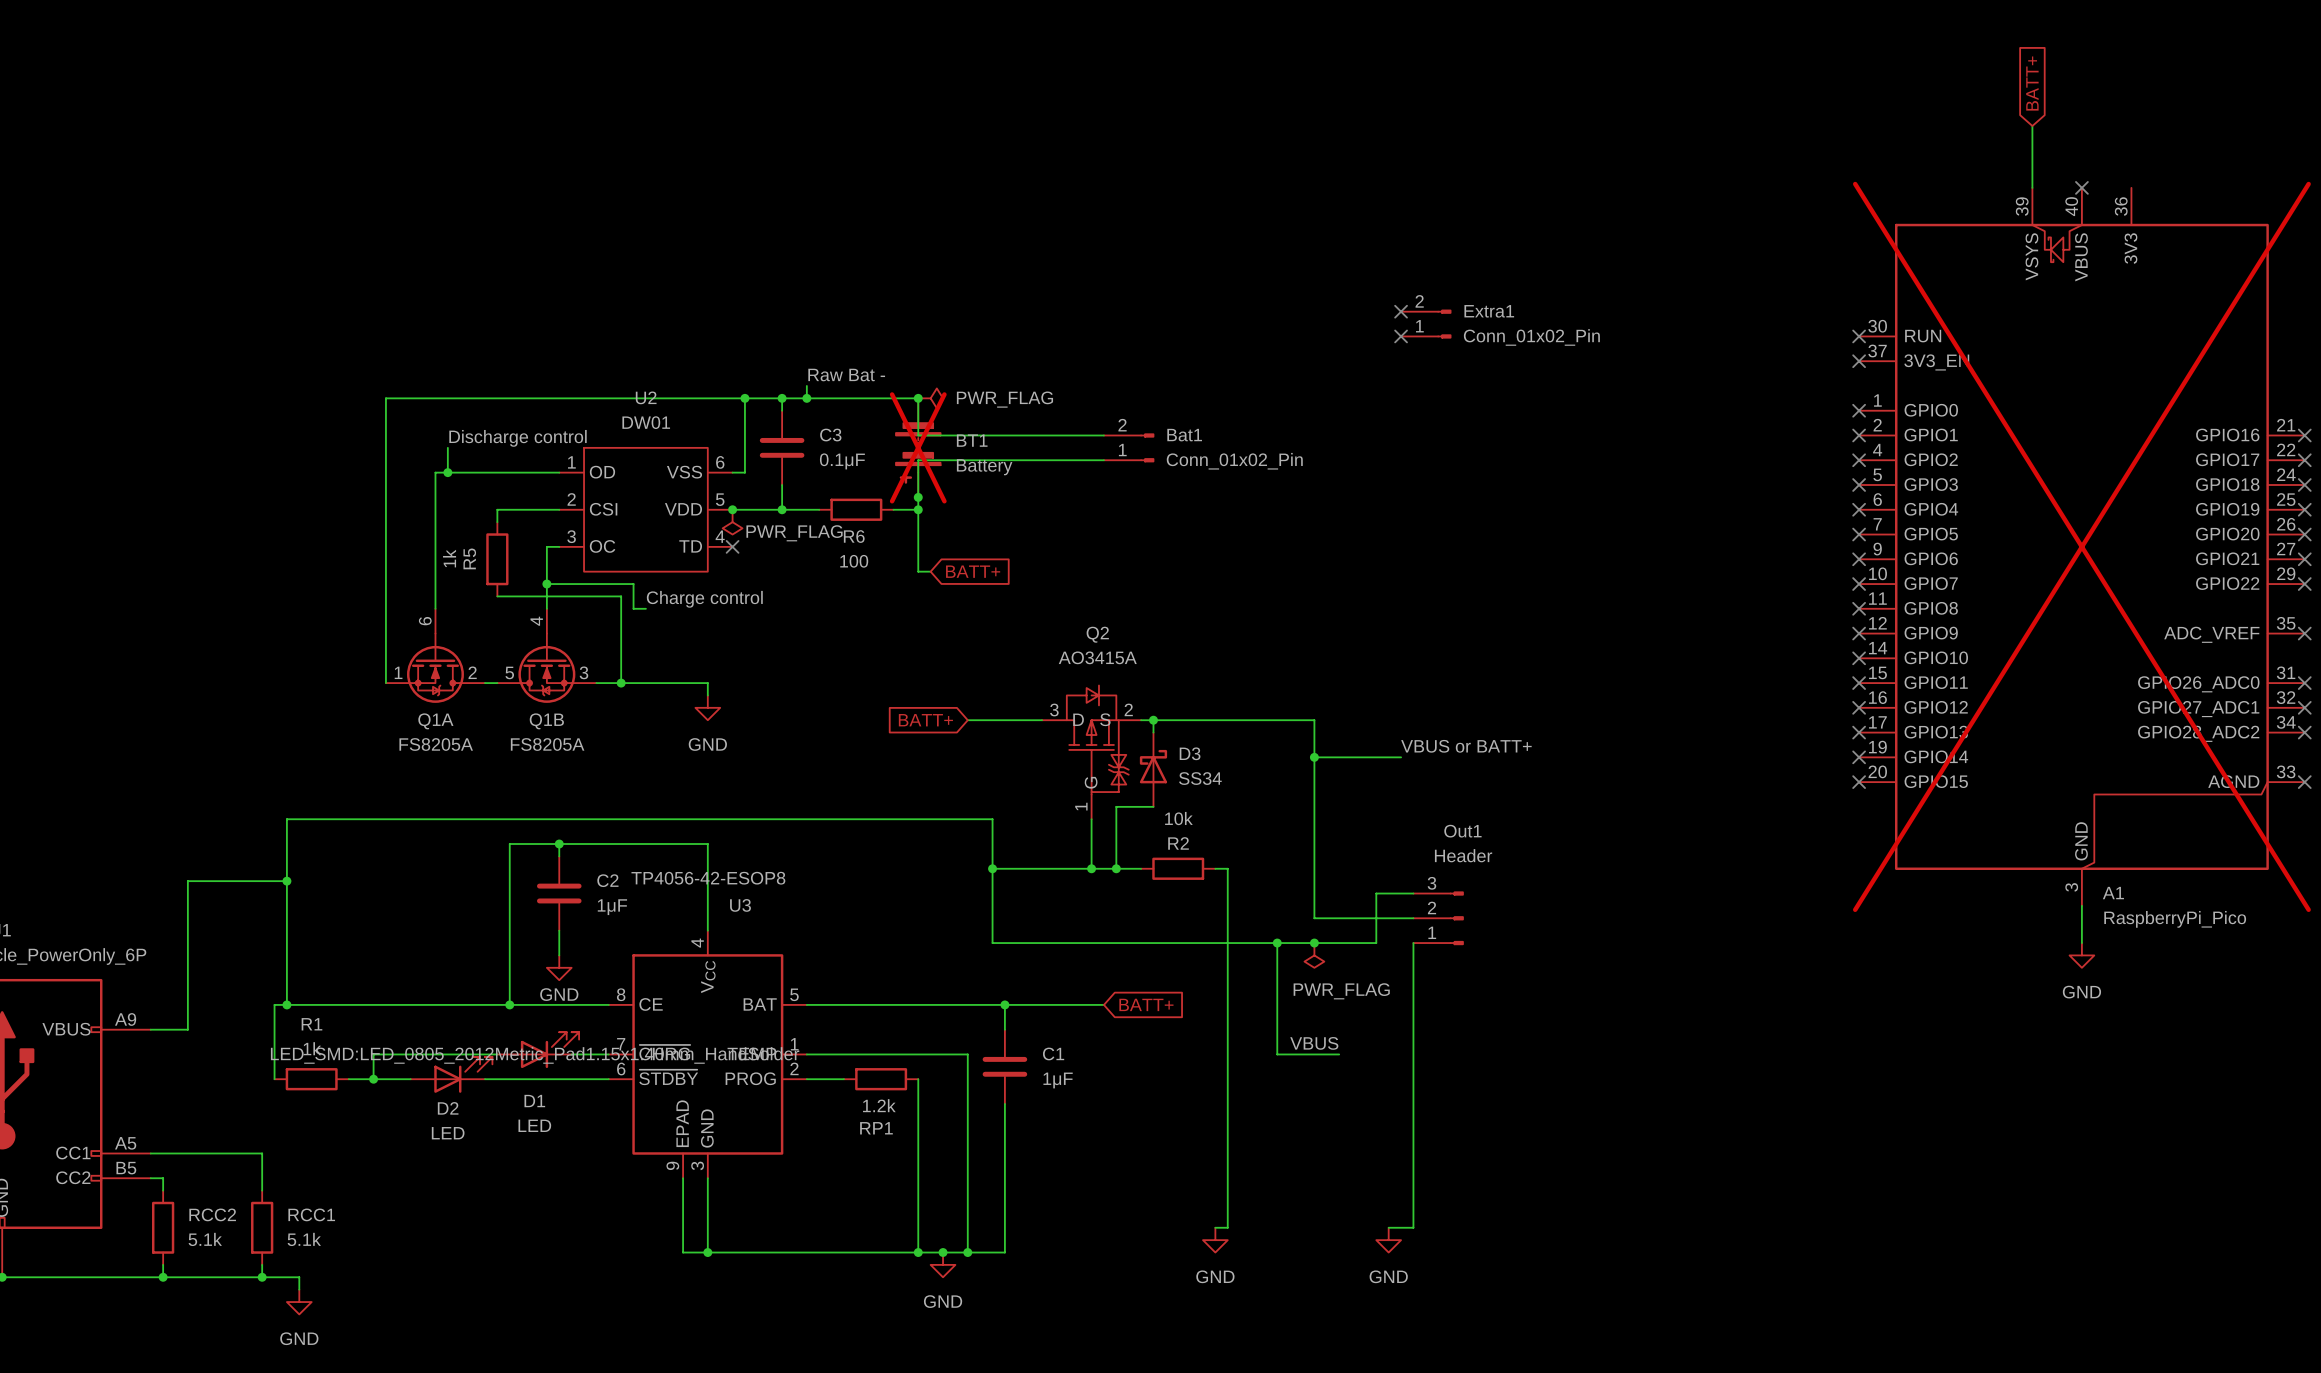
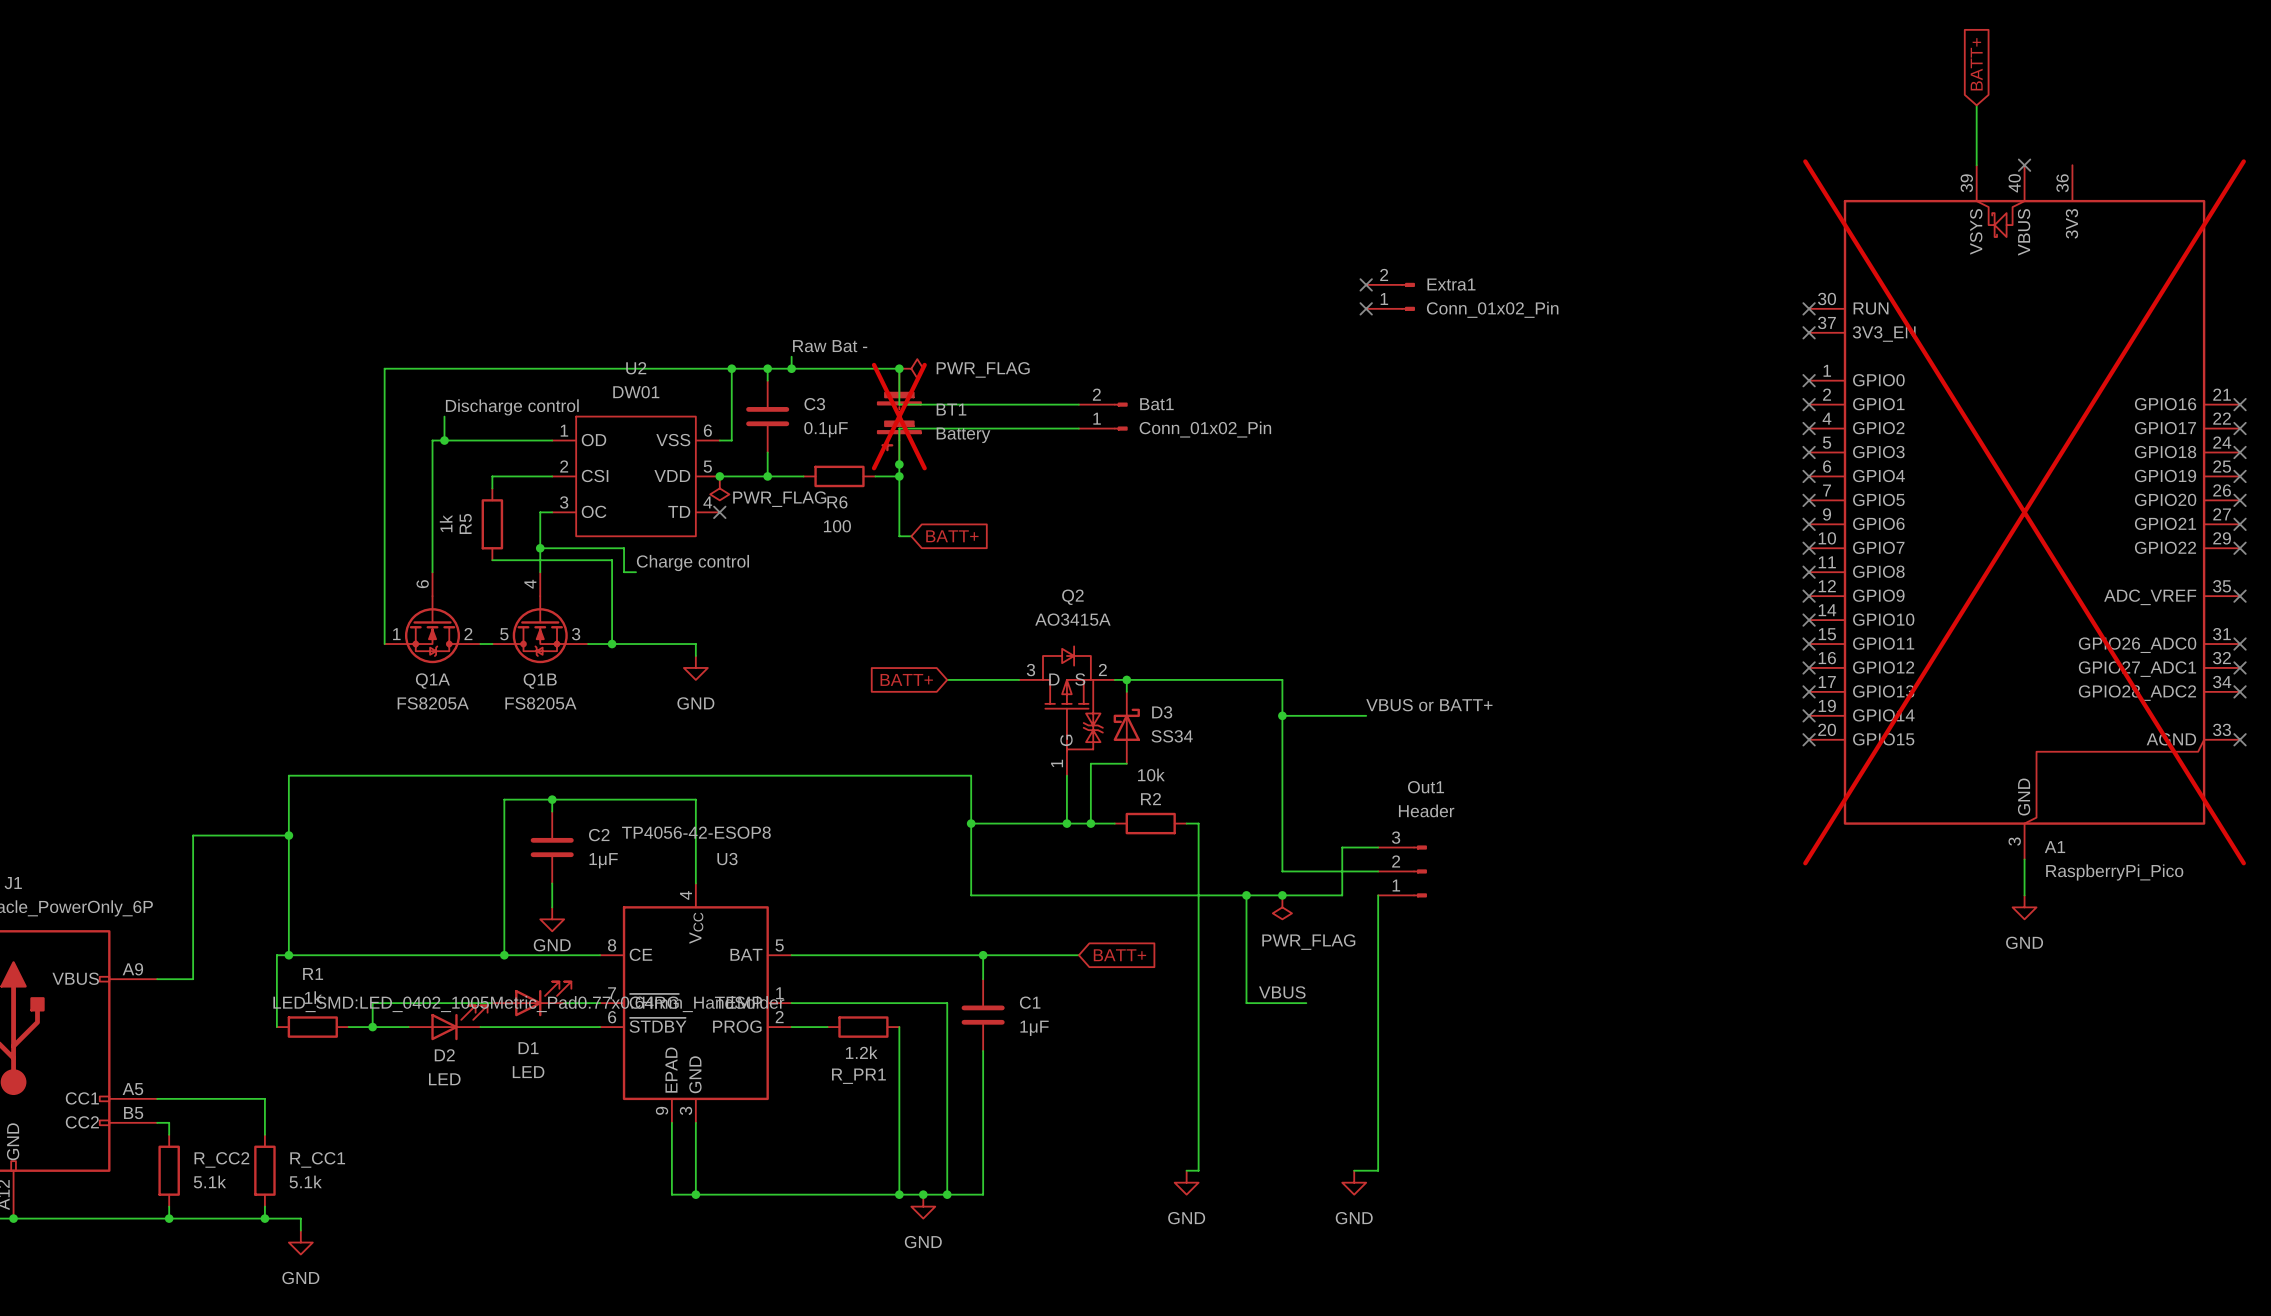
D1 text: LED_SMD:LED_0805_2012Metric_Pad1.15x1.40mm_HandSolder (535, 1055) -> LED_SMD:LED_0402_1005Metric_Pad0.77x0.64mm_HandSolder (528, 1004)
RP1 name: RP1 (876, 1128) -> R_PR1 (858, 1076)
RCC2 name: RCC2 (212, 1214) -> R_CC2 (221, 1159)
RCC1 name: RCC1 (311, 1214) -> R_CC1 (317, 1159)

